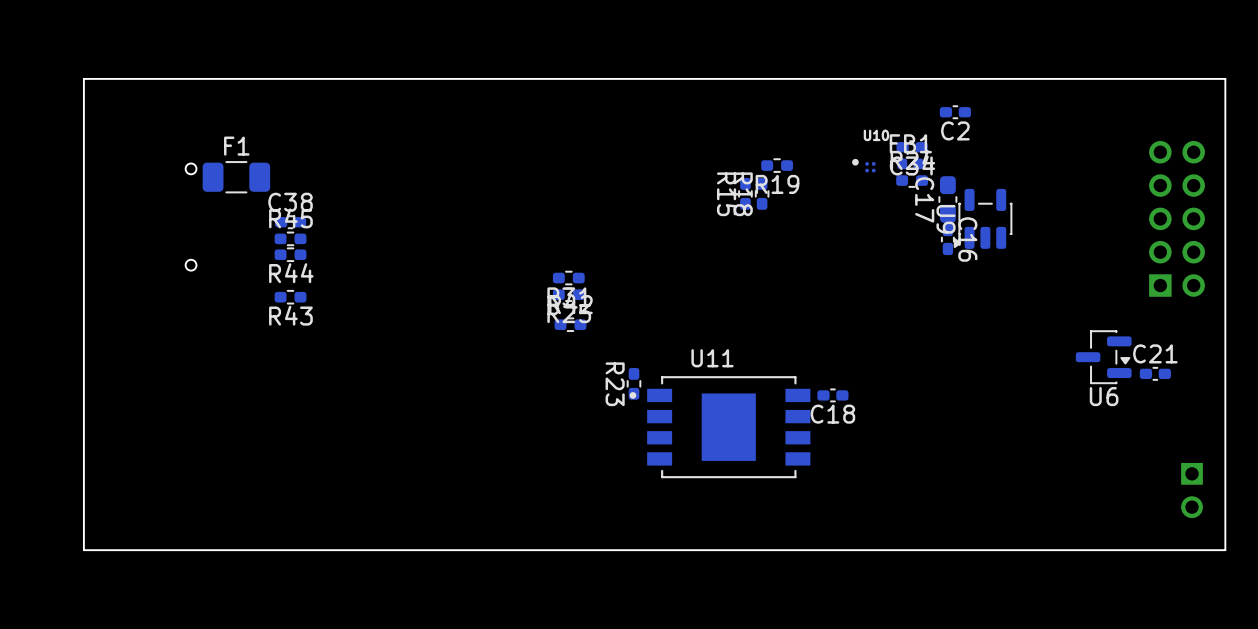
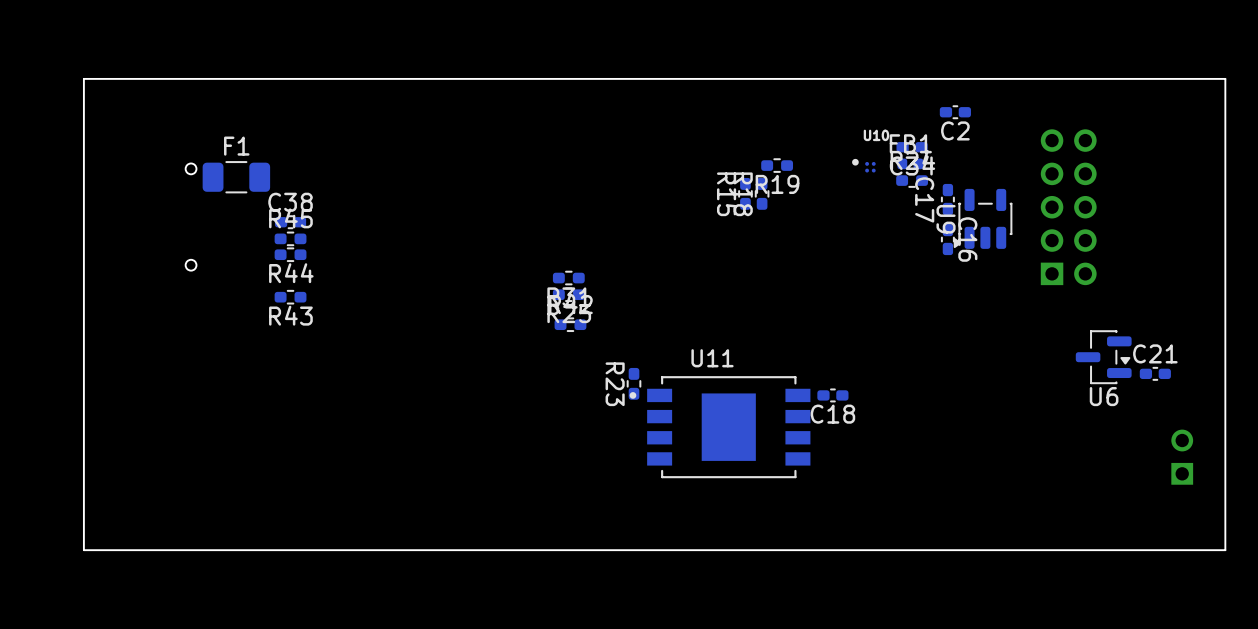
C17 footprint: [938, 176, 958, 223] -> [940, 183, 955, 216]
part position: (1177, 218) -> (1068, 207)
part rotation: 0° (1192, 490) -> 180° (1182, 457)
part position: (1192, 490) -> (1182, 457)

